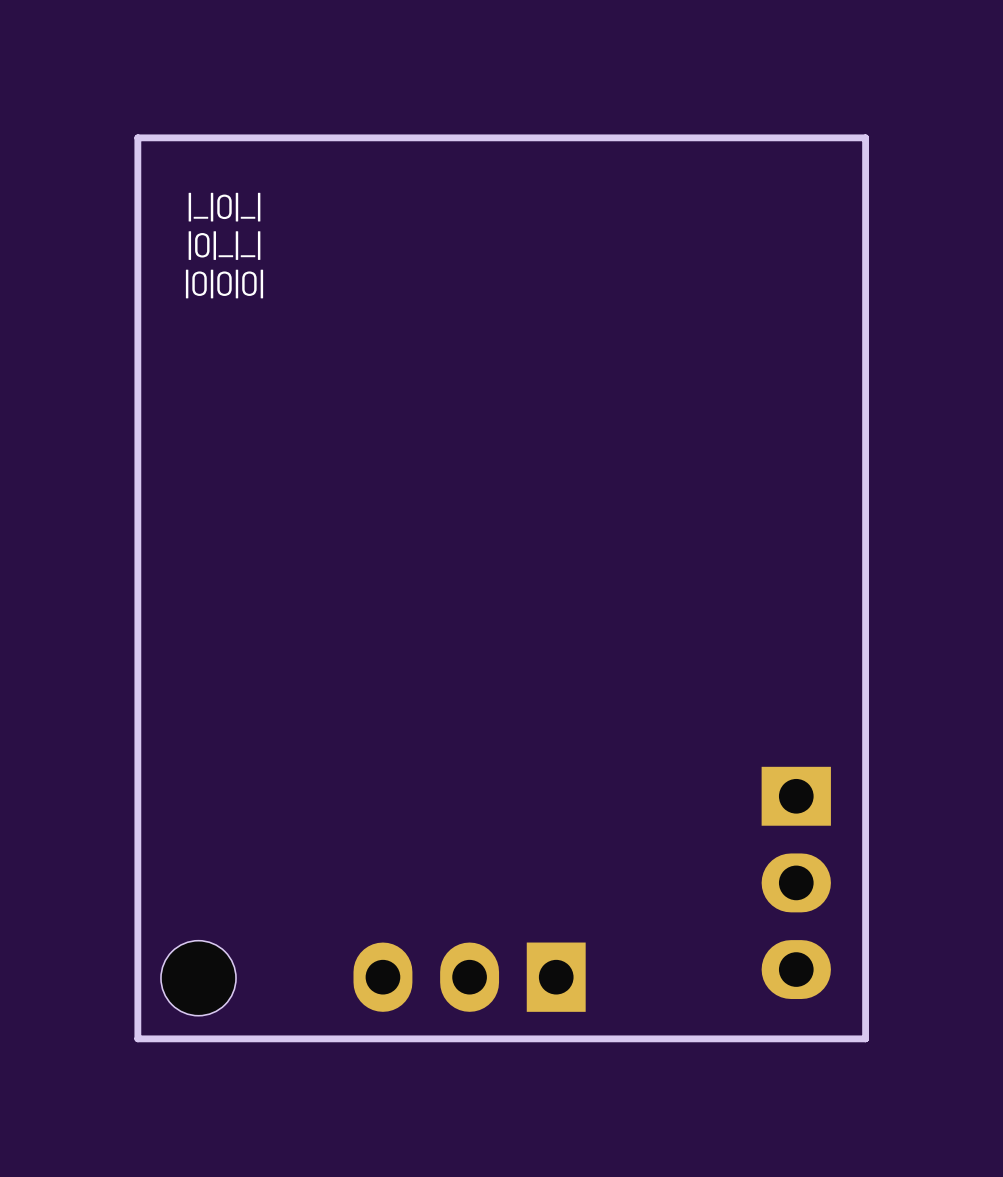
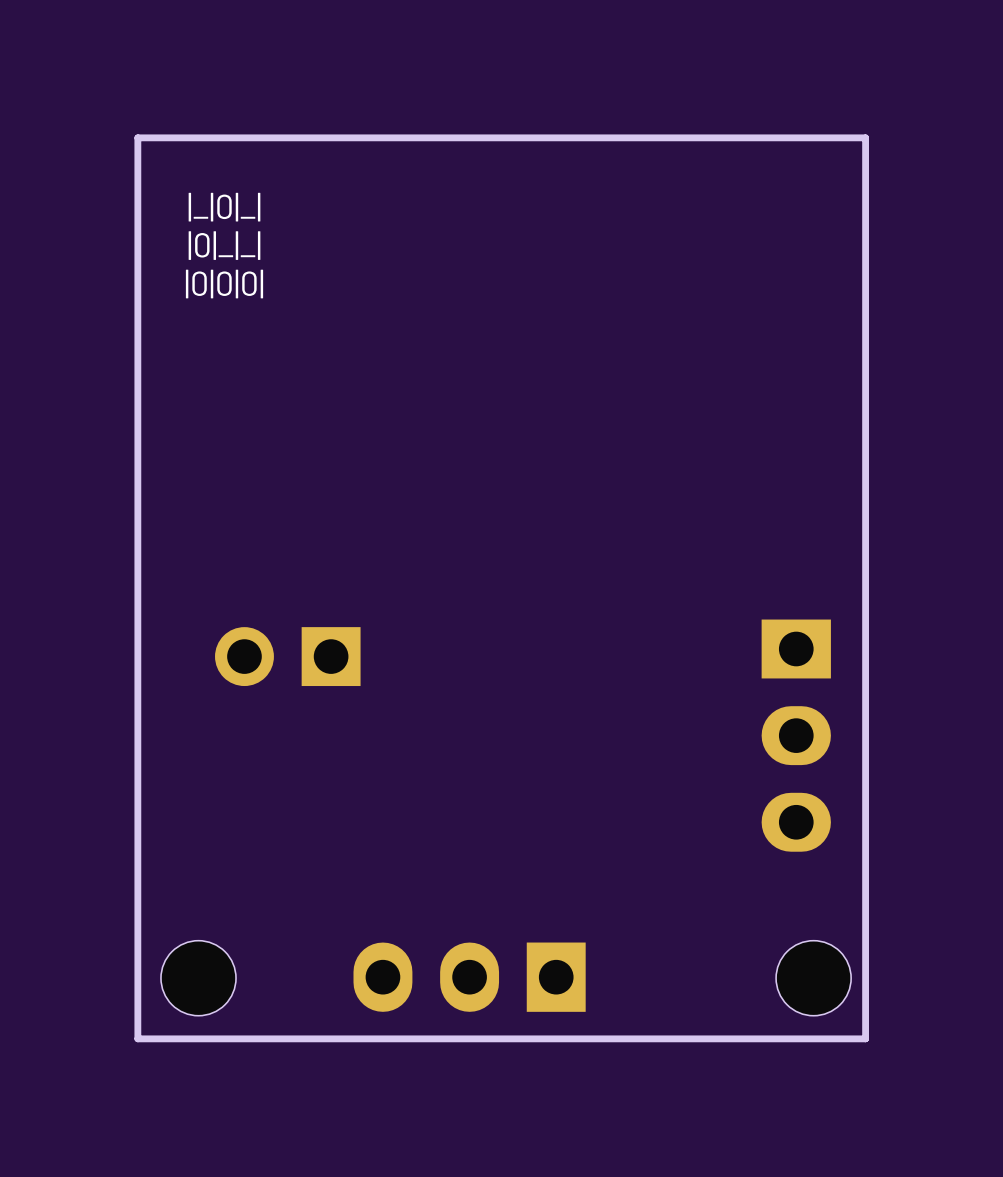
part: none -> (287, 656)
part position: (796, 882) -> (796, 735)
part: none -> (813, 978)

